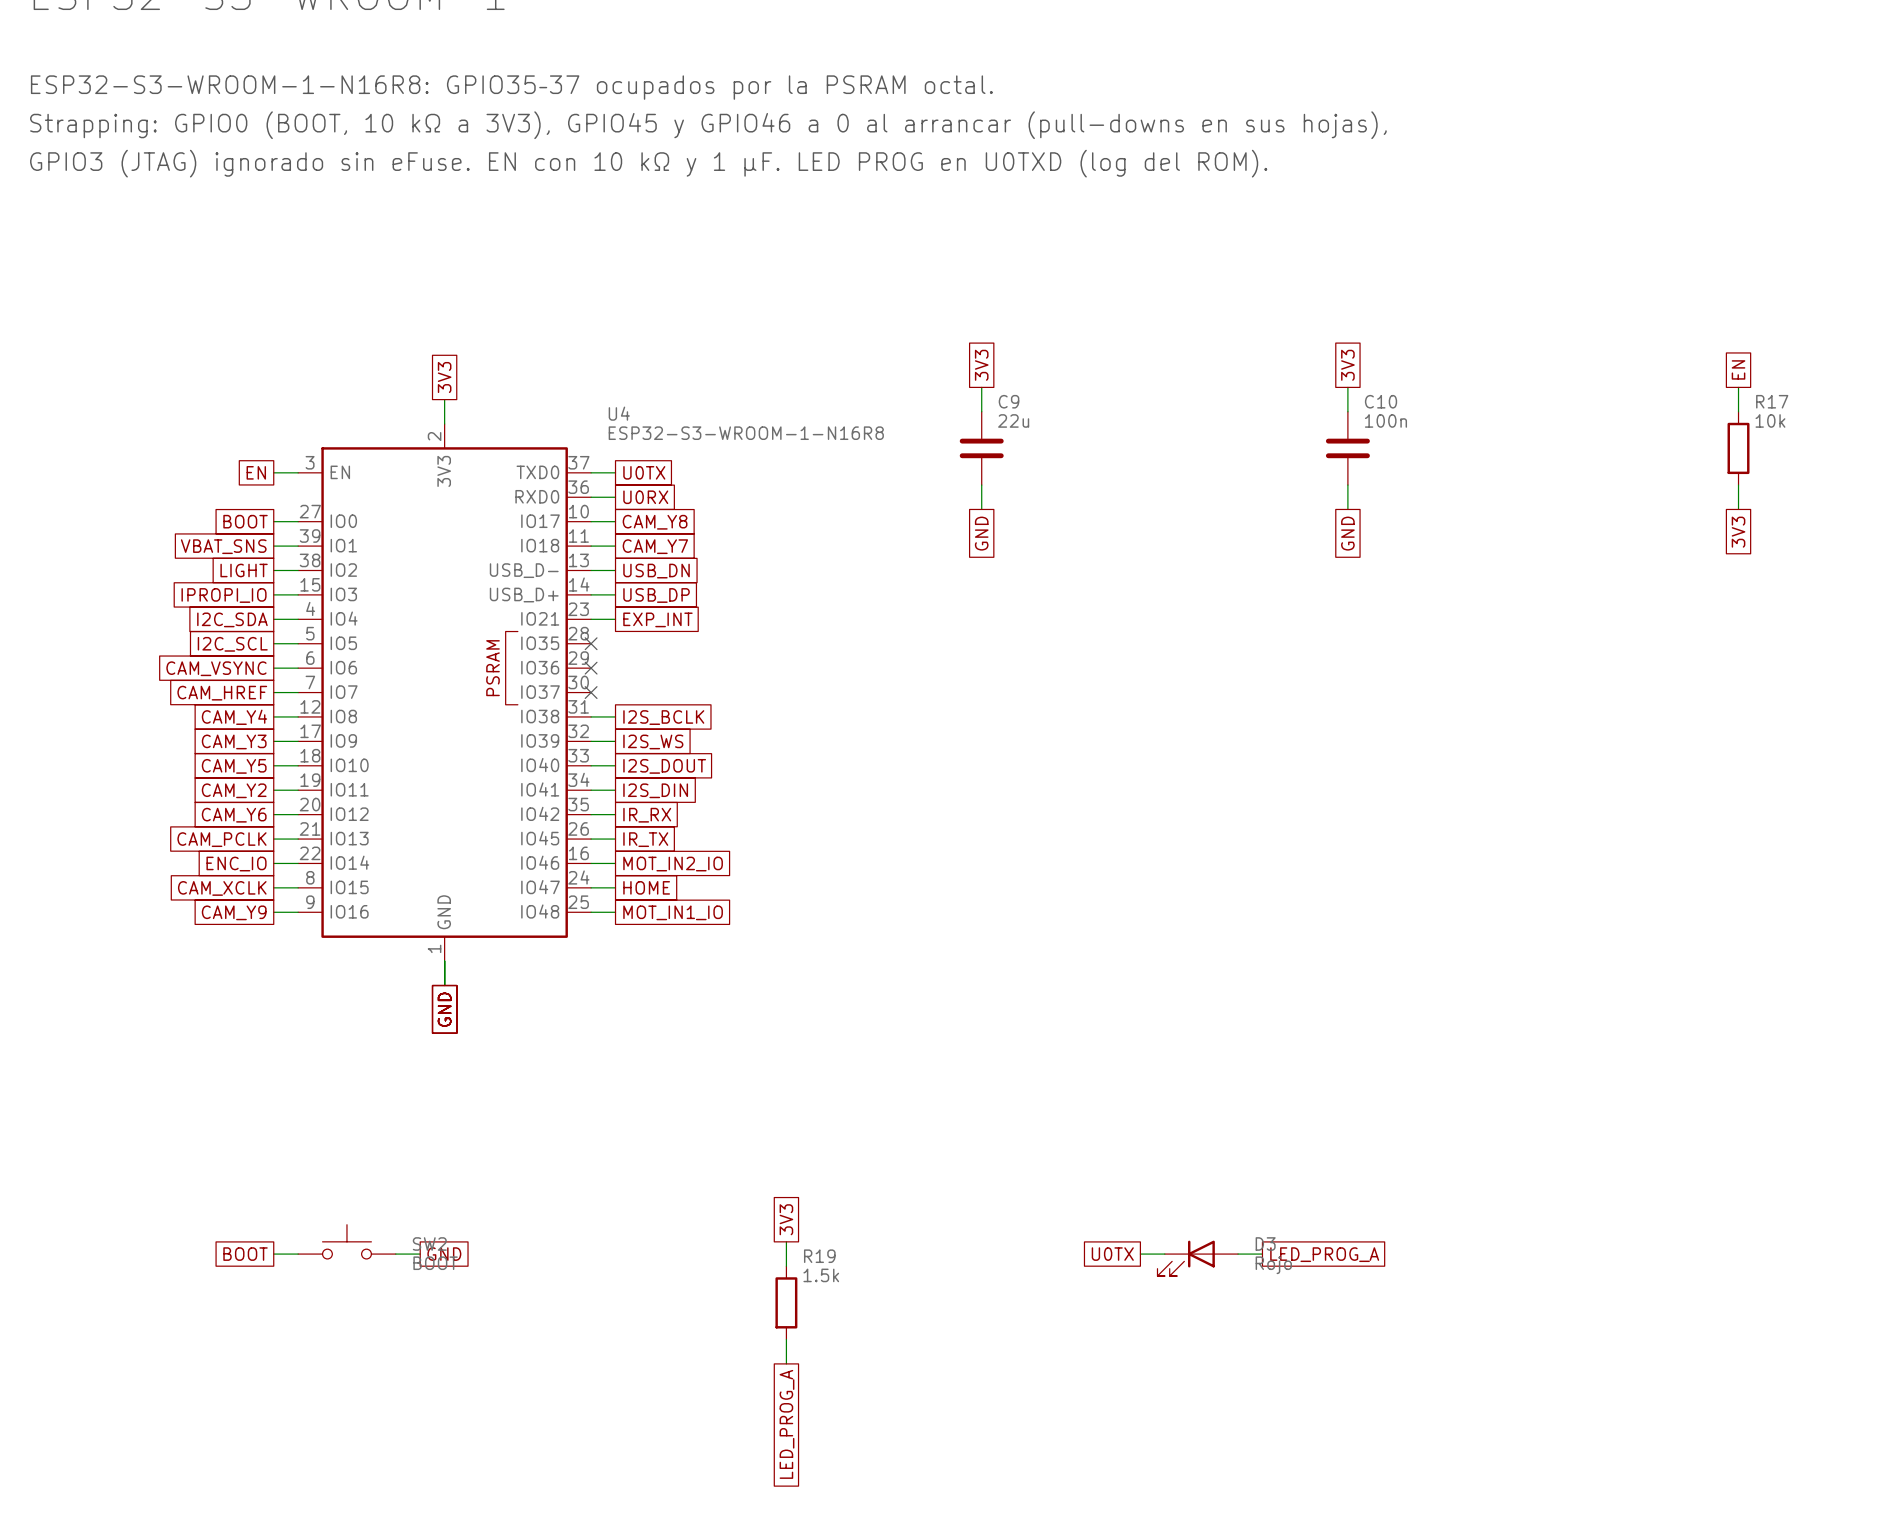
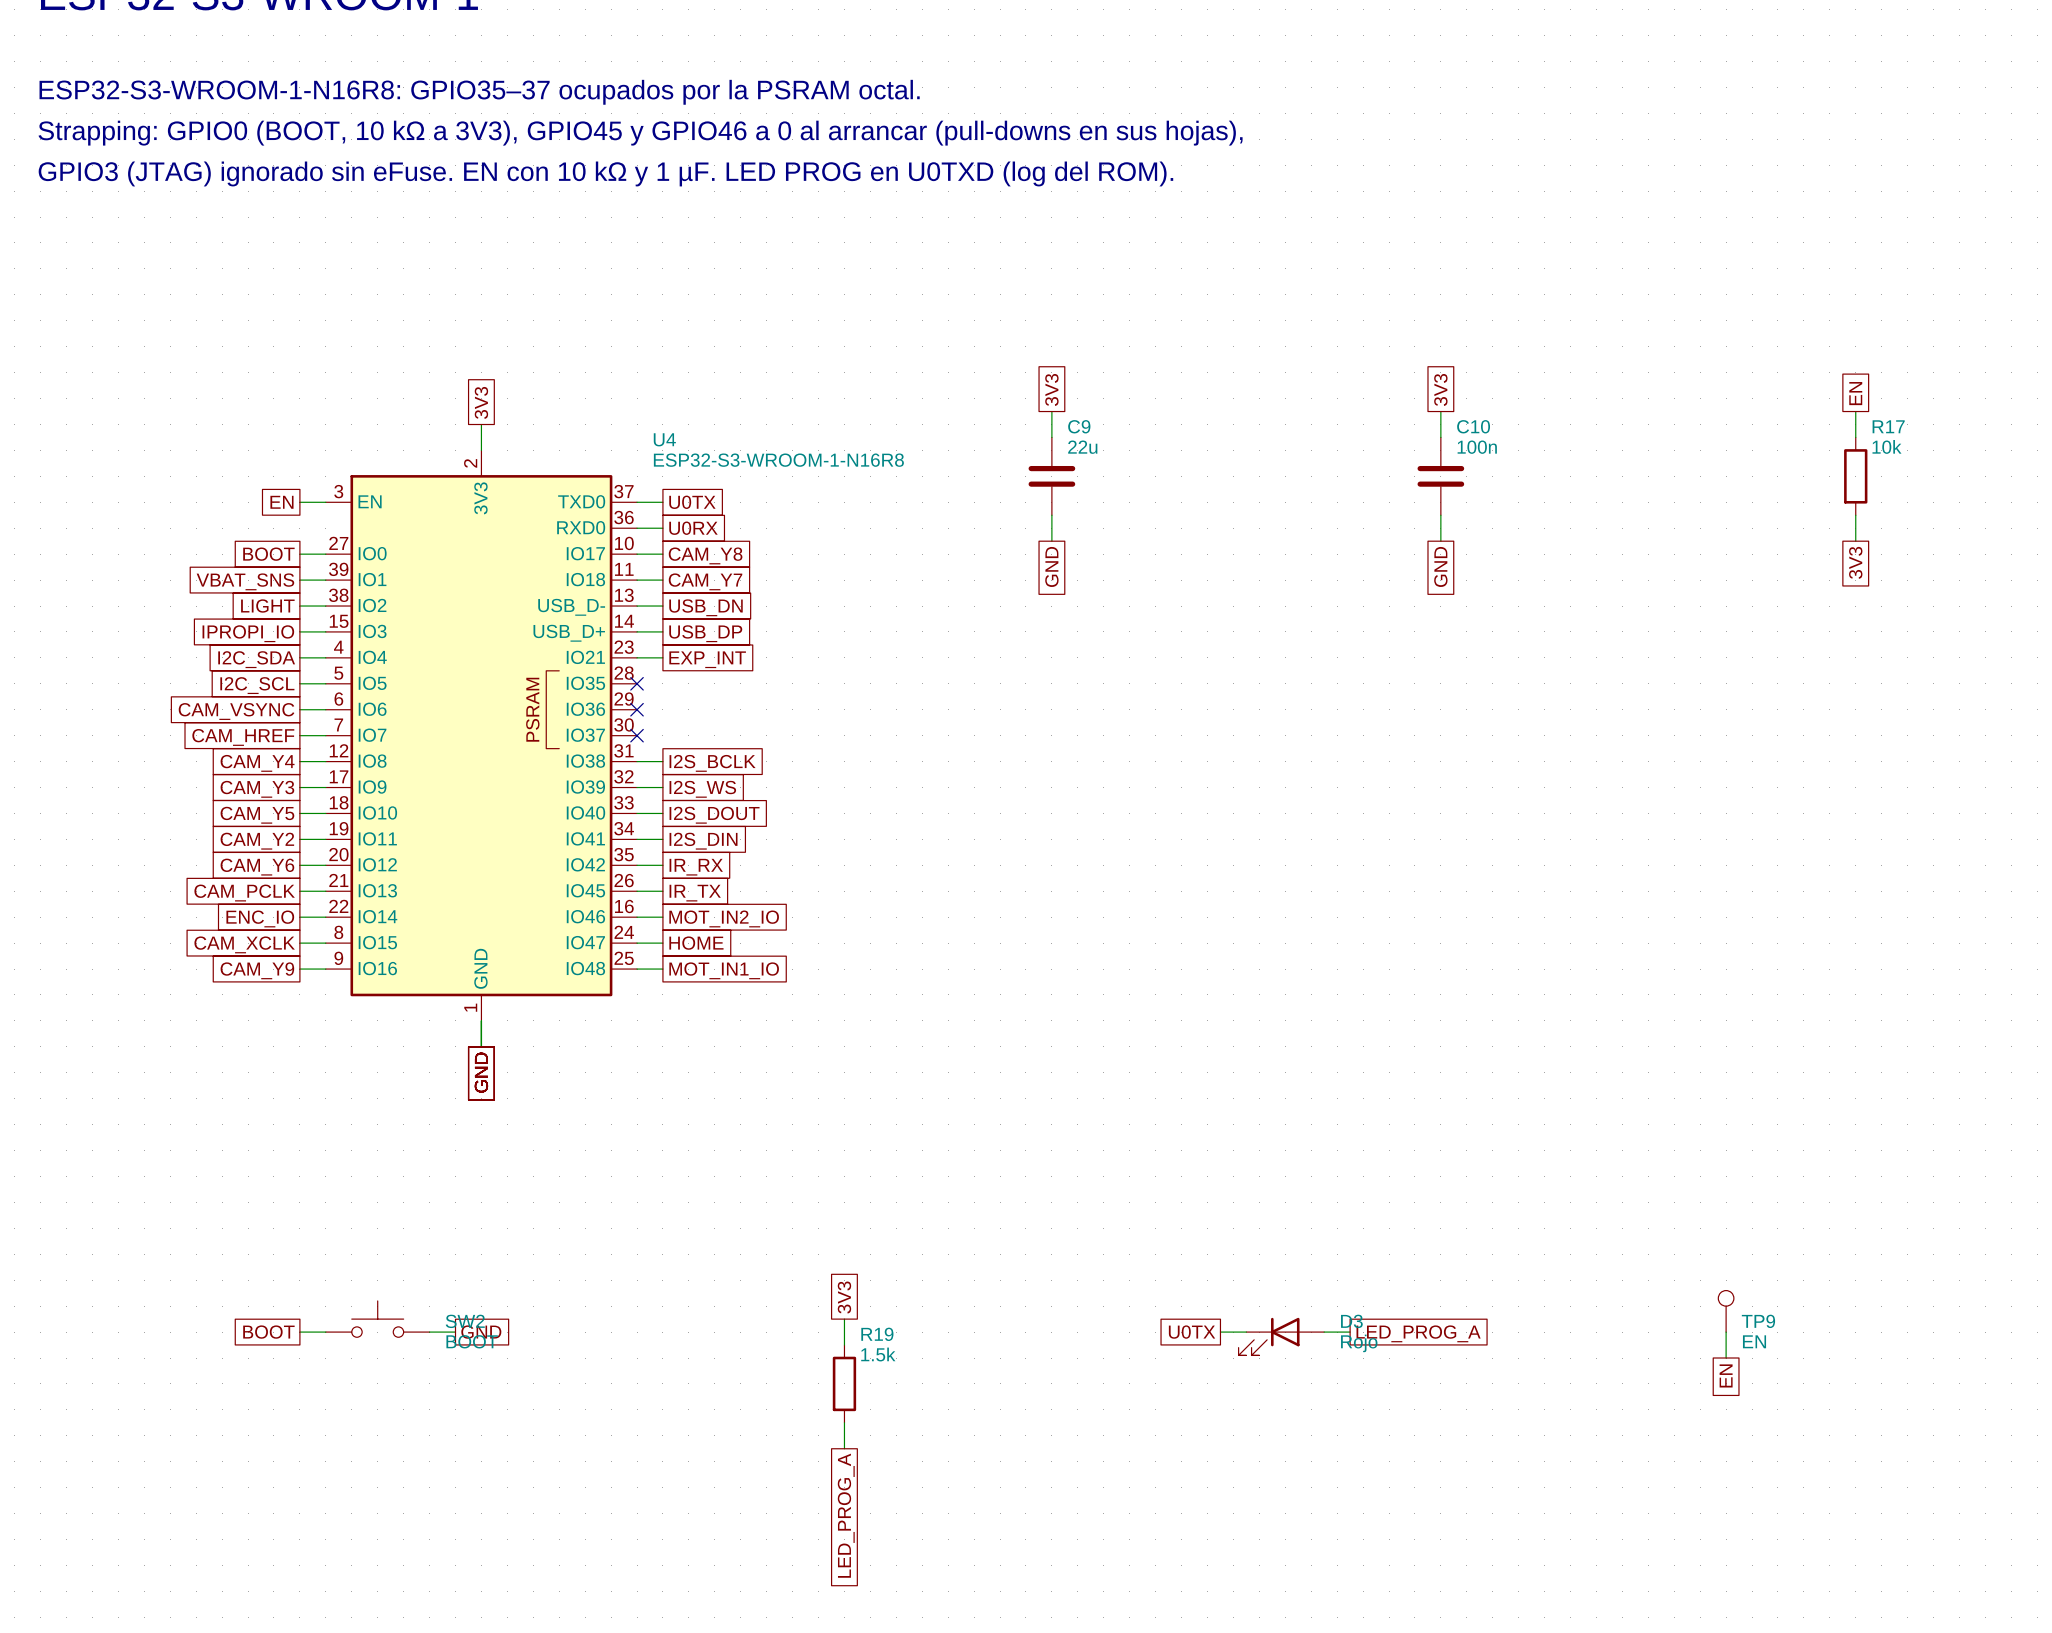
TP9: none -> EN (1726, 1311)
wire: none -> (1726, 1332) (1726, 1358)
global label: none -> EN (1726, 1375)

